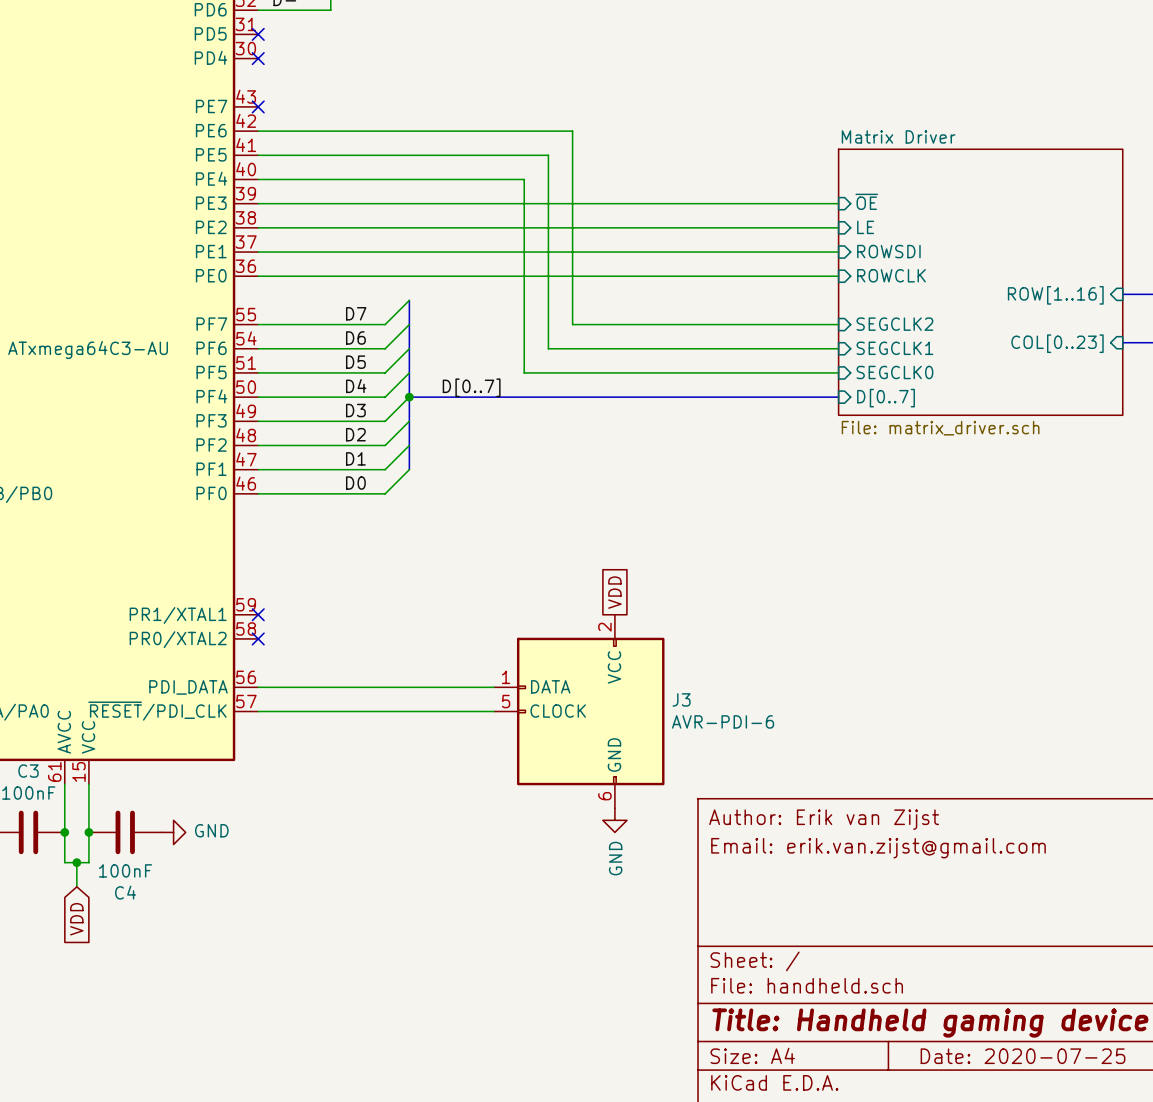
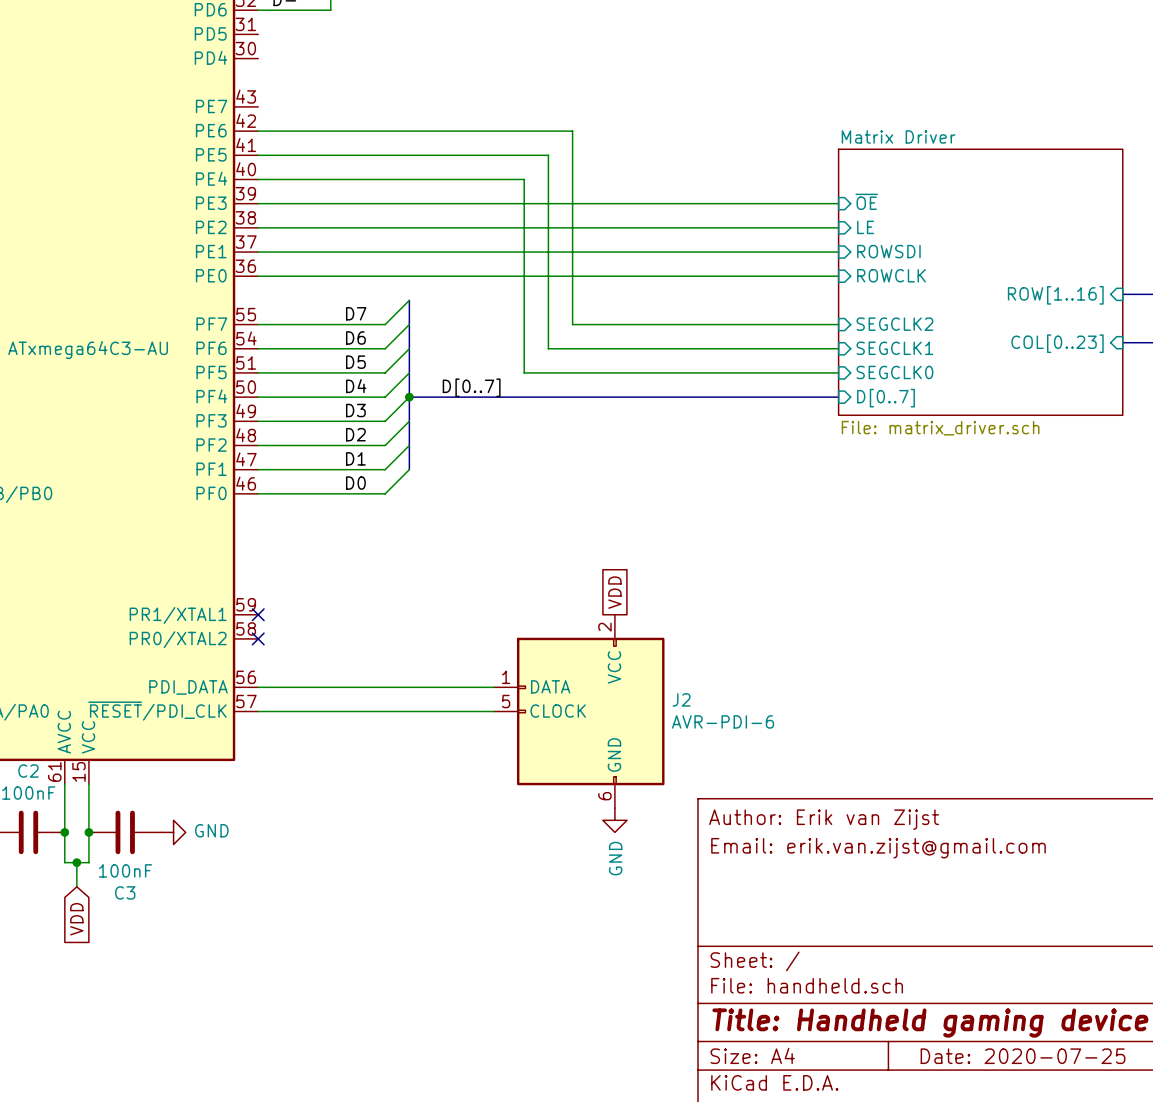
no-connect mark: (258, 34) -> none
no-connect mark: (258, 58) -> none
no-connect mark: (258, 106) -> none
J3 name: J3 (681, 699) -> J2 (681, 699)
C3 name: C3 (28, 771) -> C2 (28, 771)
C4 name: C4 (125, 892) -> C3 (125, 892)

